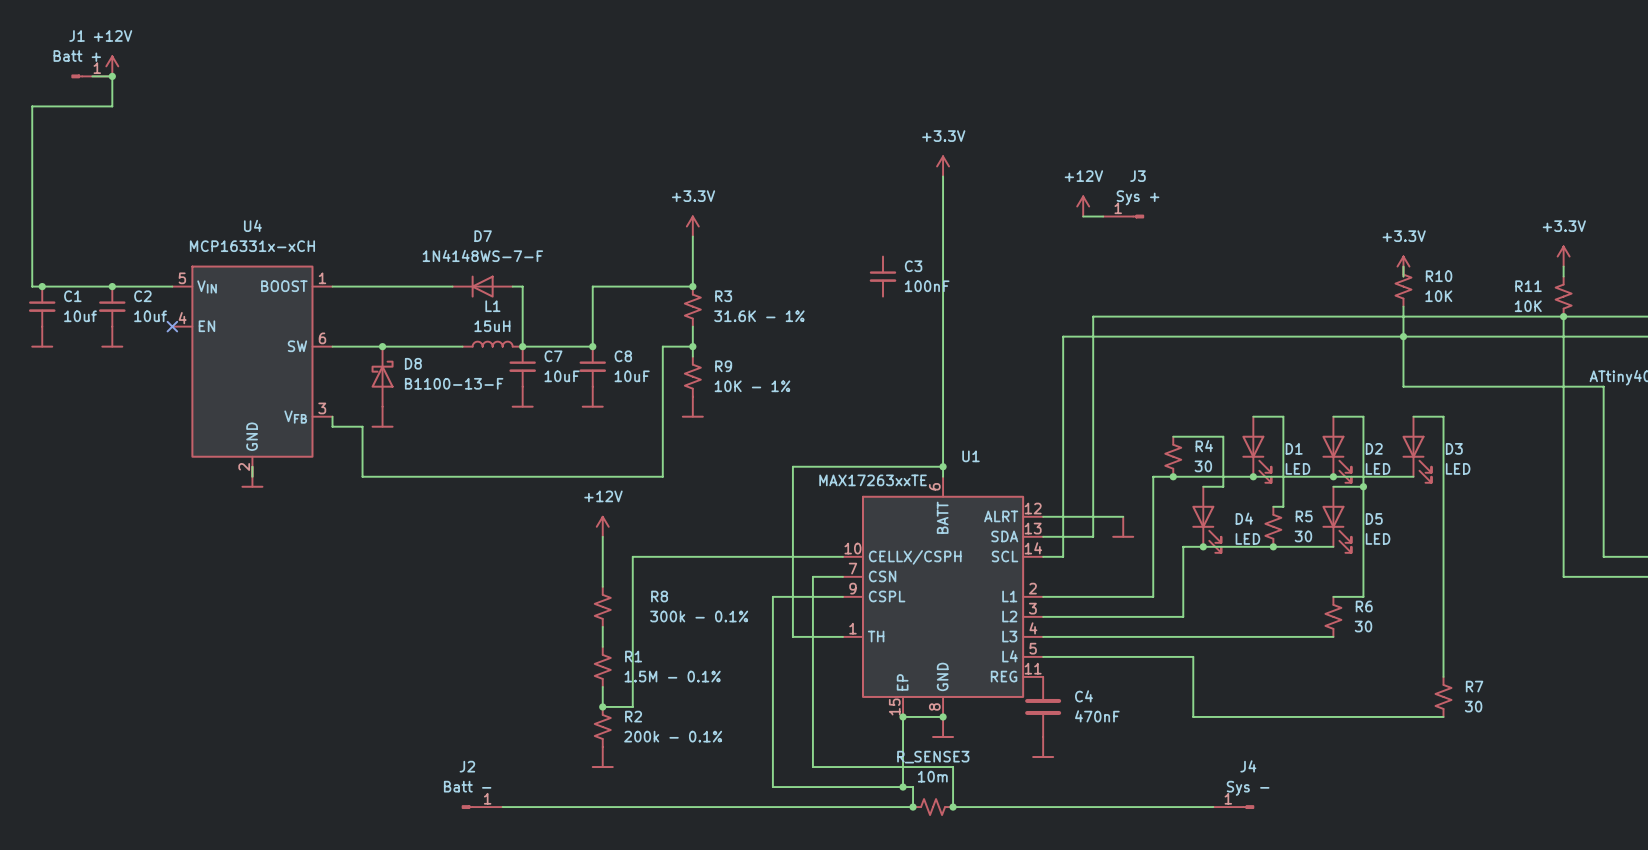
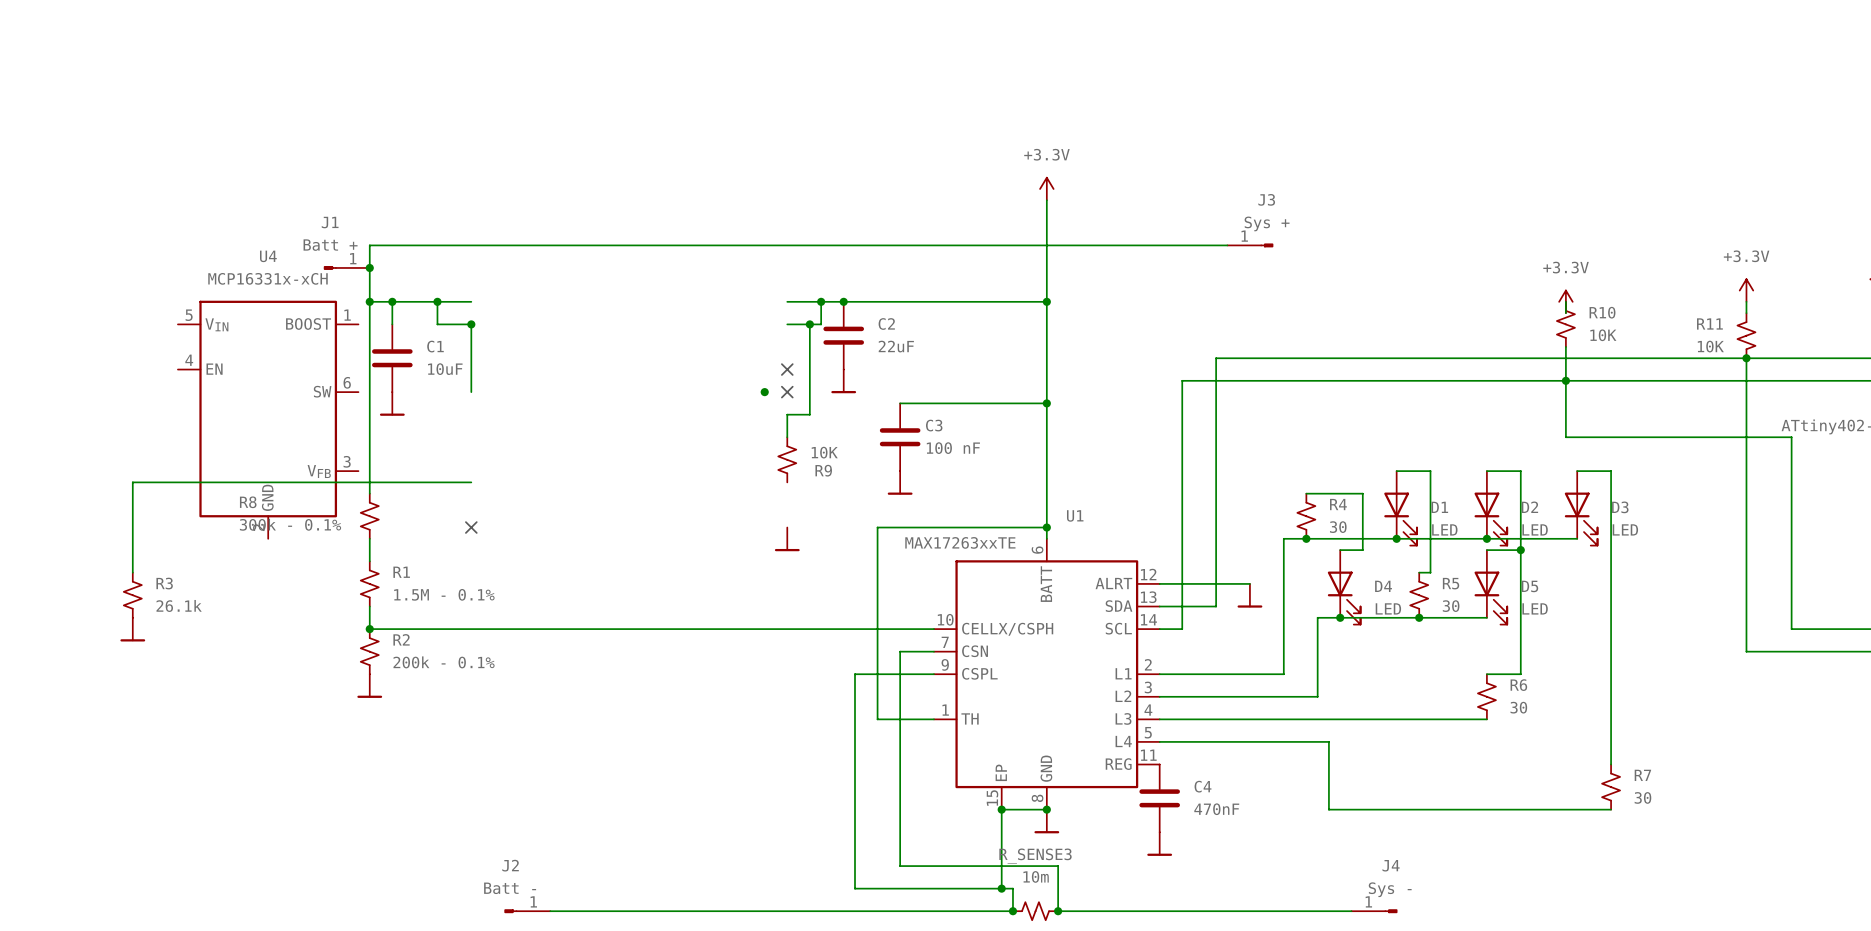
power symbol: +12V (112, 66) -> none
J1 position: (91, 76) -> (346, 267)
wire: (92, 76) (112, 76) (112, 106) (32, 106) (32, 286) (172, 286) -> none
junction: (112, 76) -> none
power symbol: +12V (1083, 206) -> none
wire: none -> (1204, 245) (369, 245) (369, 493)
power symbol: +3.3V (692, 226) -> none
junction: none -> (369, 267)
wire: (692, 236) (692, 286) (592, 286) (592, 346) (522, 346) (522, 286) (512, 286) -> none
C3 symbol: [869, 256, 897, 297] -> [879, 403, 921, 472]
wire: none -> (369, 301) (471, 301)
junction: none -> (369, 301)
wire: none -> (392, 301) (392, 324)
junction: none -> (392, 301)
junction: none -> (437, 301)
wire: none -> (787, 301) (1046, 301)
wire: none -> (821, 301) (821, 324) (787, 324)
junction: none -> (821, 301)
junction: none -> (843, 301)
junction: none -> (1046, 301)
C1 symbol: [28, 286, 56, 327] -> [372, 324, 413, 393]
junction: (42, 286) -> none
C2 symbol: [98, 286, 126, 327] -> [823, 301, 865, 370]
junction: (112, 286) -> none
wire: (332, 286) (402, 286) -> (437, 301) (437, 324)
wire: (432, 286) (452, 286) -> (471, 324) (471, 392)
junction: none -> (471, 324)
D7: 1N4148WS-7-F (482, 286) -> none
junction: (692, 286) -> none
wire: none -> (809, 324) (809, 414) (787, 414) (787, 437)
junction: none -> (809, 324)
C3 value: 100nF (927, 286) -> 100 nF (953, 448)
R3 position: (692, 306) -> (132, 595)
C1 value: 10uf (80, 316) -> 10uF (445, 369)
C2 value: 10uf (150, 316) -> 22uF (896, 346)
R3 value: 31.6K - 1% (759, 316) -> 26.1k (179, 605)
no-connect mark: (172, 326) -> none
wire: (692, 326) (692, 356) -> none
no-connect mark: none -> (787, 369)
power symbol: (42, 337) -> none
power symbol: (112, 337) -> none
power symbol: none -> (843, 381)
L1: 15uH (492, 344) -> none
wire: (332, 346) (462, 346) -> none
junction: (382, 346) -> none
junction: (522, 346) -> none
junction: (592, 346) -> none
wire: (692, 346) (662, 346) (662, 476) (362, 476) (362, 426) -> (471, 482) (392, 482)
no-connect mark: none -> (787, 392)
wire: none -> (900, 403) (1046, 403)
junction: none -> (1046, 403)
C7: 10uF (522, 366) -> none
C8: 10uF (592, 366) -> none
R9 name position: R9 (723, 366) -> R9 (823, 470)
D8: B1100-13-F (382, 376) -> none
R9 position: (692, 376) -> (787, 459)
R9 value: 10K - 1% (752, 386) -> 10K (824, 452)
power symbol: (522, 397) -> none
power symbol: (592, 397) -> none
power symbol: (692, 407) -> none
wire: (332, 416) (332, 426) -> (132, 572) (132, 482) (358, 482)
power symbol position: (382, 417) -> (392, 403)
power symbol: none -> (900, 482)
no-connect mark: none -> (471, 527)
wire: none -> (369, 538) (369, 561)
power symbol: (252, 477) -> none
power symbol: none -> (787, 539)
power symbol: +12V (602, 526) -> none
wire: (602, 536) (602, 586) -> none
junction: none -> (369, 629)
wire: (632, 556) (632, 706) (602, 706) (602, 686) -> (697, 629) (369, 629) (369, 606)
power symbol: none -> (132, 629)
R8 name position: R8 (659, 596) -> R8 (248, 502)
R8 position: (602, 606) -> (369, 516)
power symbol: none -> (369, 686)
R8 value position: 300k - 0.1% (699, 616) -> 300k - 0.1% (290, 524)
wire: (602, 626) (602, 646) -> none
R1 position: (602, 666) -> (369, 583)
junction: (602, 706) -> none
R2 position: (602, 726) -> (369, 651)
power symbol: (602, 757) -> none

